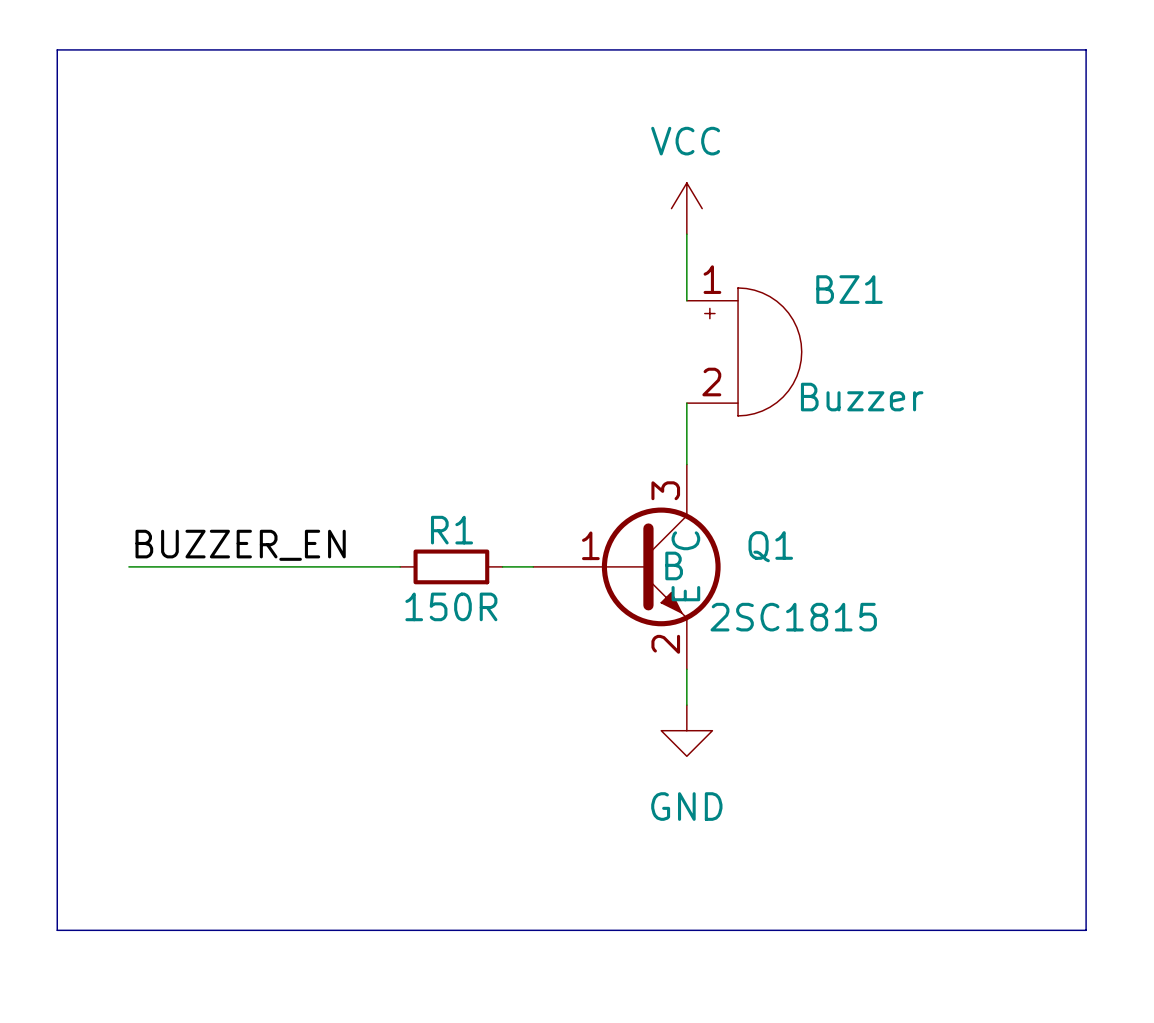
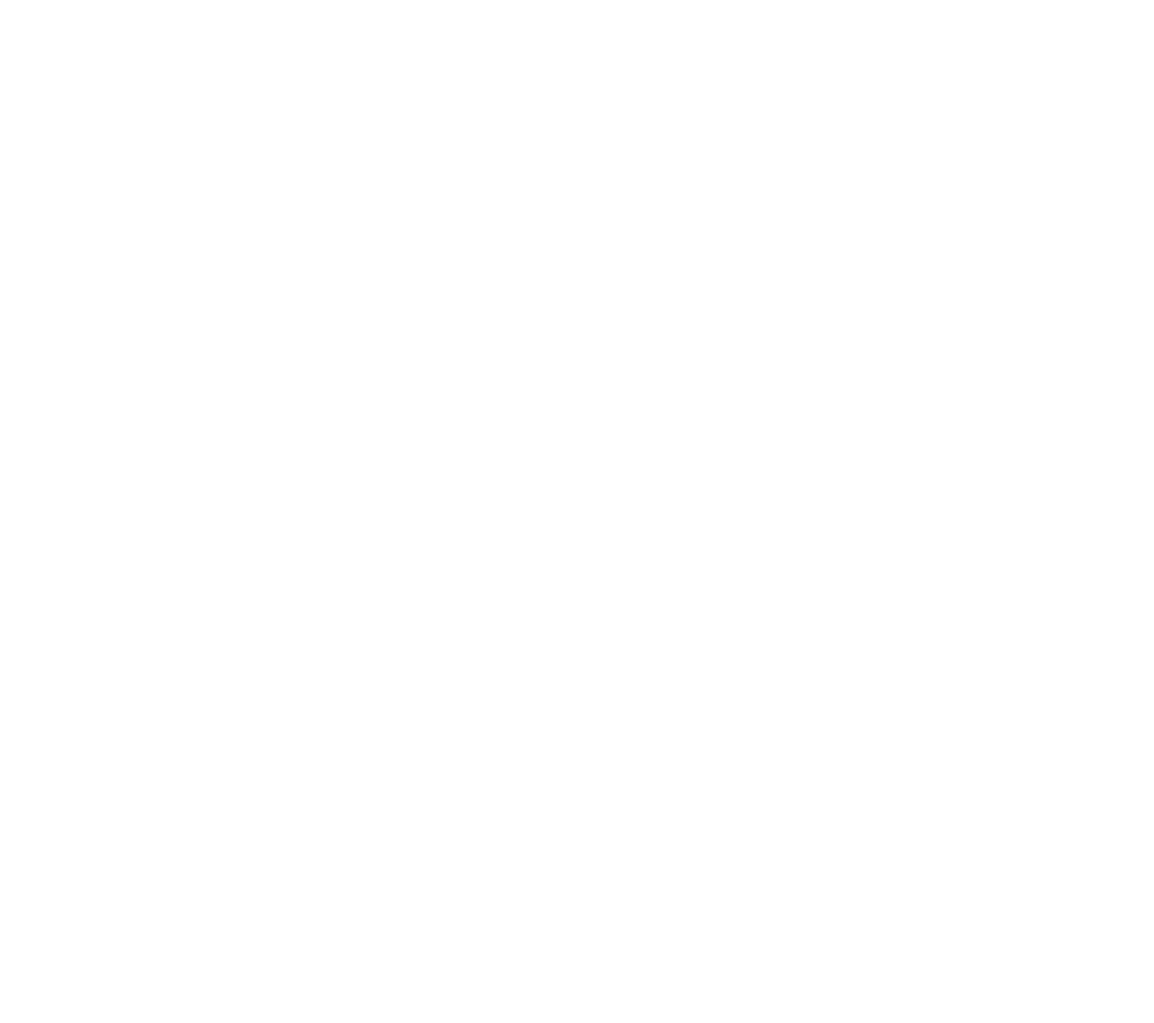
line: (57, 49) (1086, 49) (1086, 930) (57, 930) (57, 49) -> none
power symbol: VCC (686, 208) -> none
wire: (686, 234) (686, 300) -> none
BZ1: Buzzer (744, 351) -> none
wire: (686, 403) (686, 464) -> none
label: BUZZER_EN (240, 545) -> none
wire: (128, 566) (400, 566) -> none
R1: 150R (451, 566) -> none
wire: (502, 566) (533, 566) -> none
Q1: 2SC1815 (626, 566) -> none
wire: (686, 669) (686, 705) -> none
power symbol: GND (686, 730) -> none

